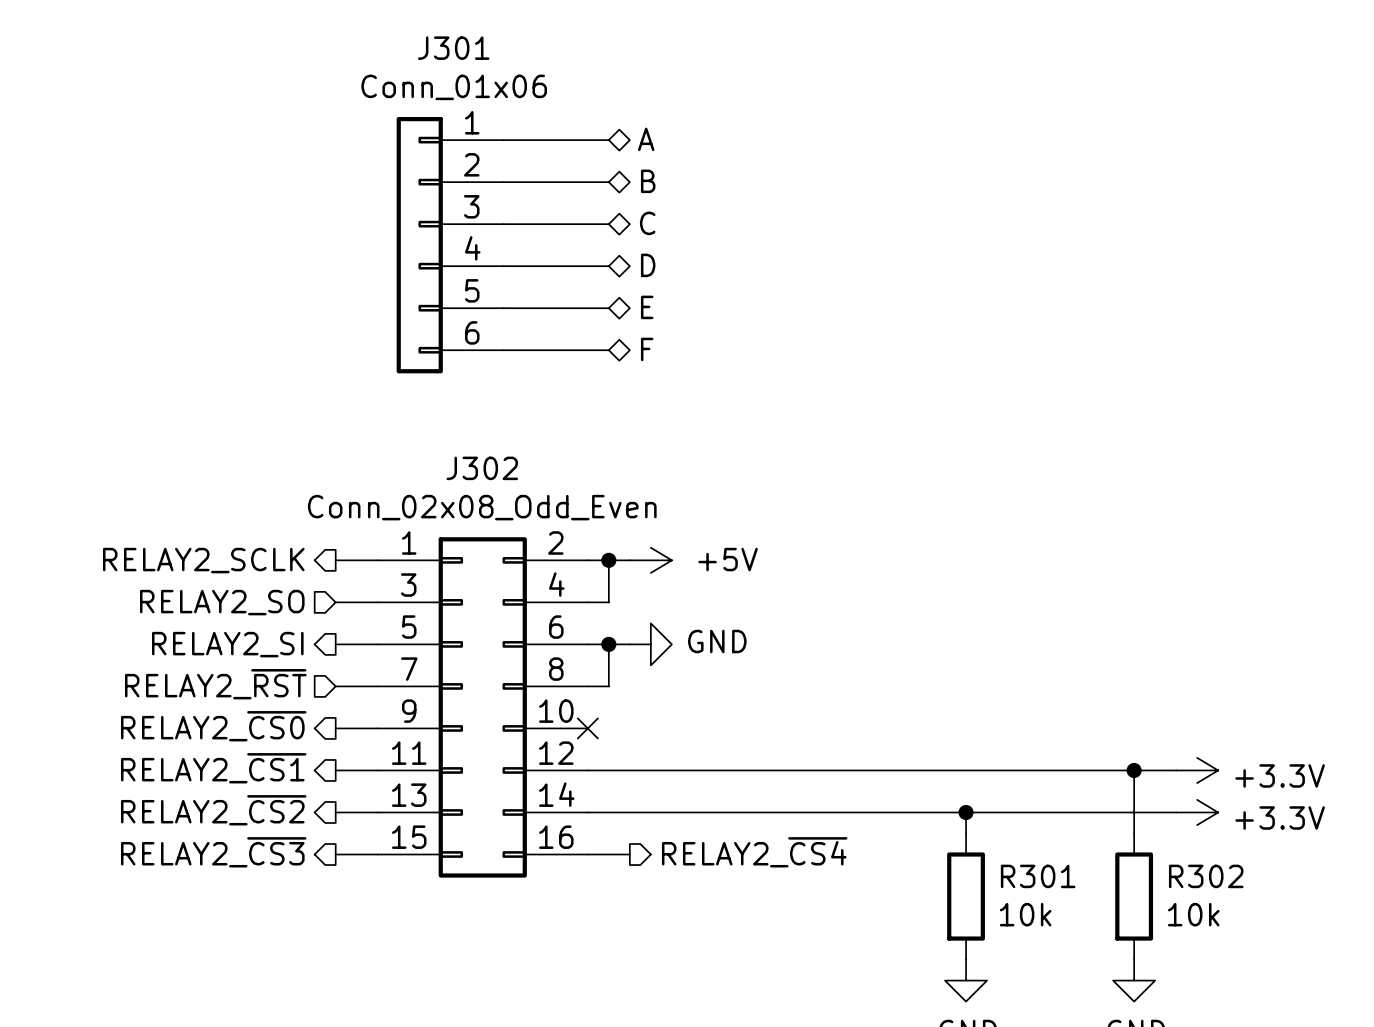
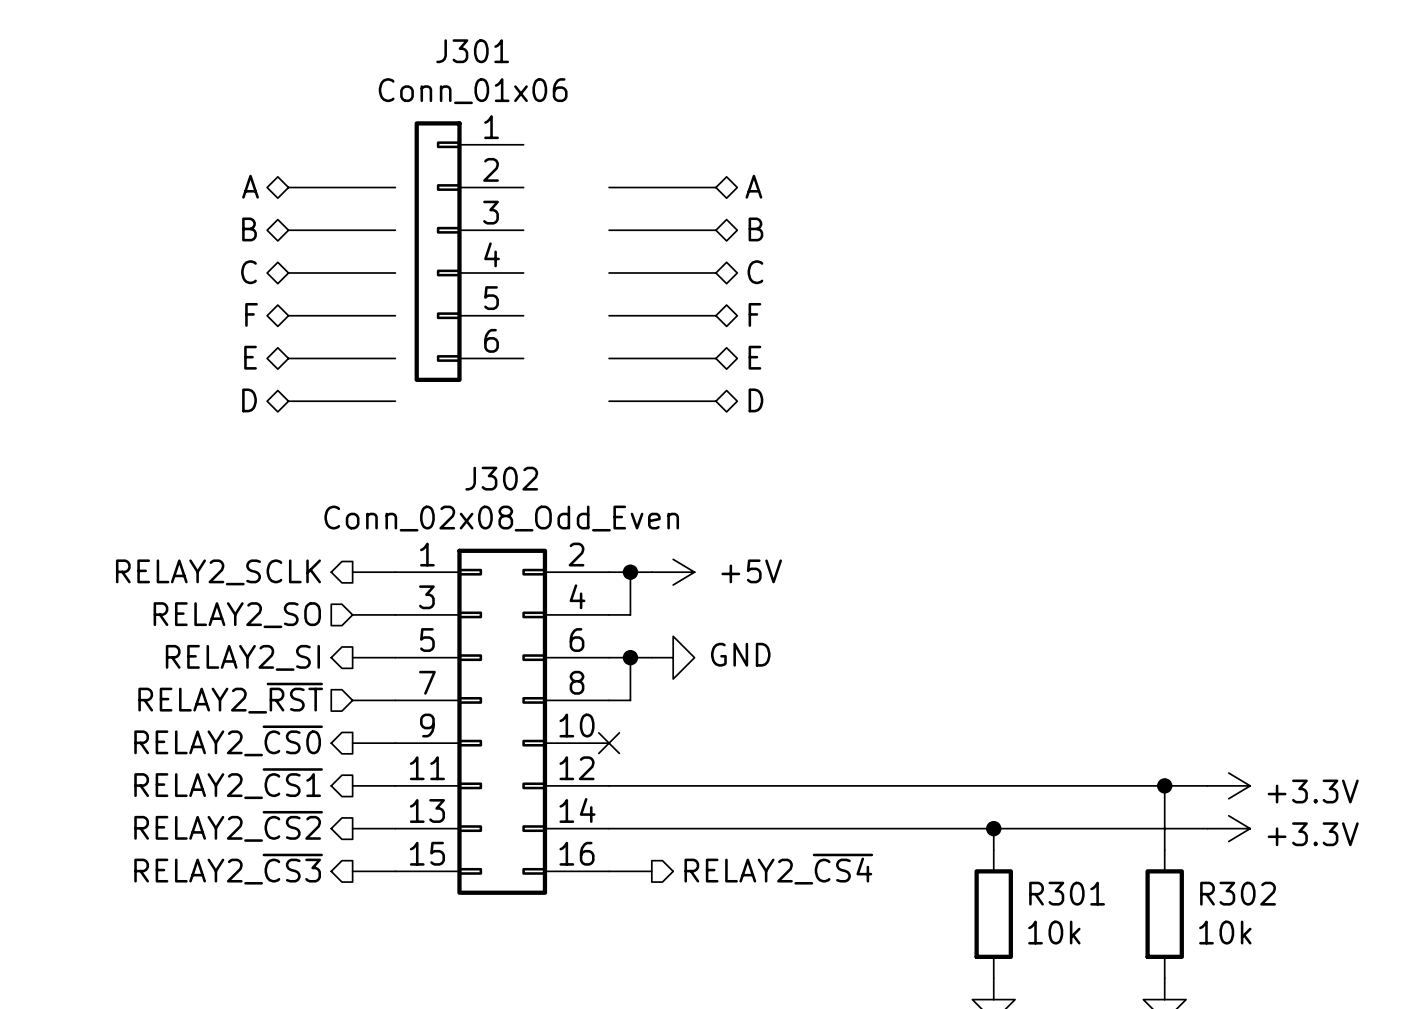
hierarchical label position: A (646, 139) -> A (753, 186)
wire: (503, 140) (608, 140) -> (288, 187) (395, 187)
hierarchical label: none -> A (250, 186)
hierarchical label position: B (648, 181) -> B (755, 229)
wire: (503, 182) (587, 182) -> (630, 187) (715, 187)
hierarchical label: none -> B (249, 229)
hierarchical label position: C (647, 223) -> C (755, 272)
wire: none -> (288, 230) (395, 230)
wire: (503, 224) (587, 224) -> (630, 230) (715, 230)
hierarchical label: none -> C (249, 272)
hierarchical label position: D (648, 265) -> D (755, 400)
wire: none -> (288, 272) (395, 272)
wire: (503, 266) (587, 266) -> (630, 272) (715, 272)
hierarchical label: none -> F (251, 314)
hierarchical label position: E (647, 307) -> E (754, 357)
wire: none -> (288, 315) (395, 315)
wire: (503, 308) (587, 308) -> (630, 315) (715, 315)
hierarchical label: none -> E (250, 357)
hierarchical label position: F (647, 349) -> F (754, 314)
wire: none -> (288, 358) (395, 358)
wire: (503, 350) (587, 350) -> (630, 358) (715, 358)
hierarchical label: none -> D (249, 400)
wire: none -> (288, 401) (395, 401)
wire: none -> (609, 401) (715, 401)

